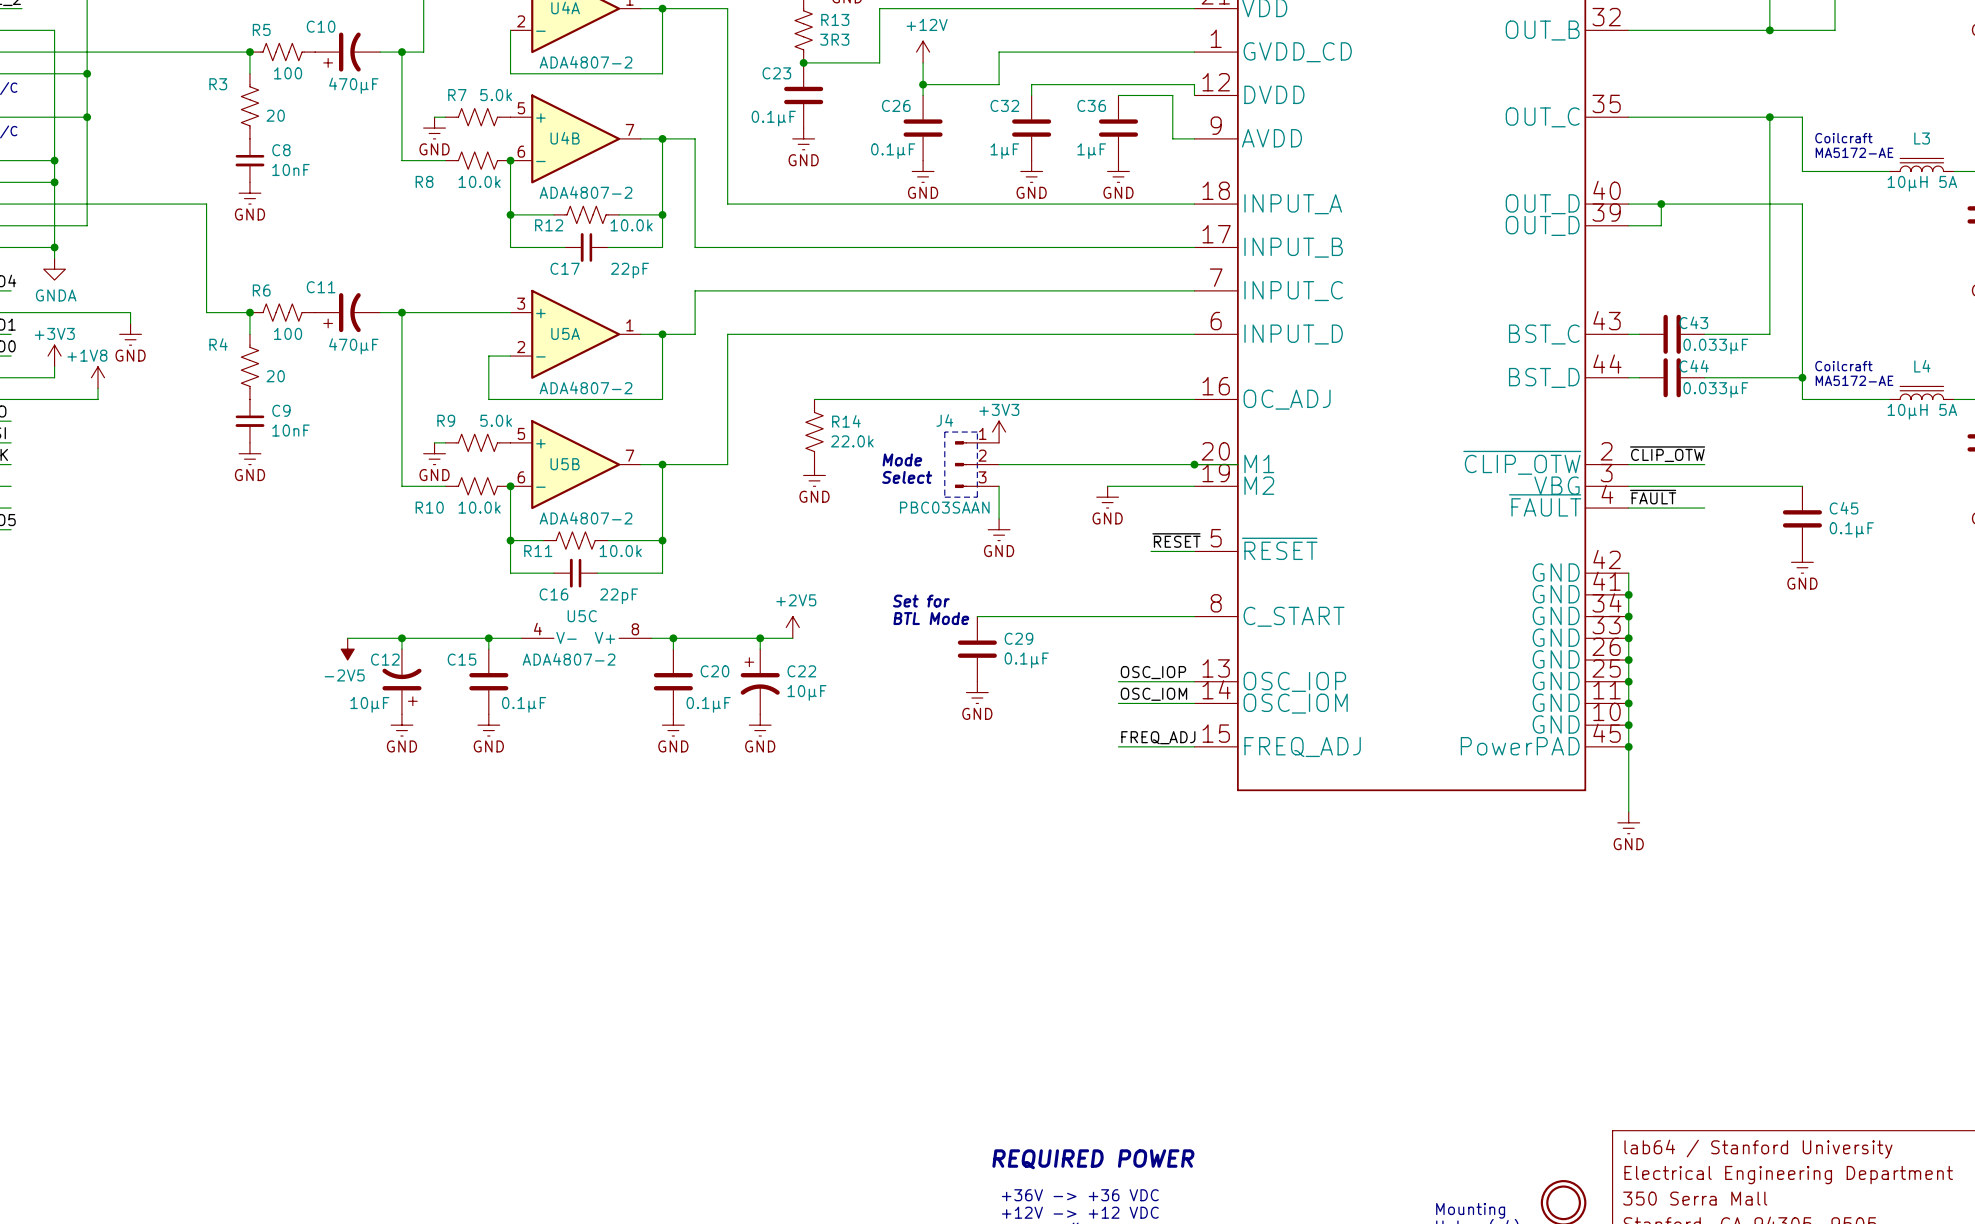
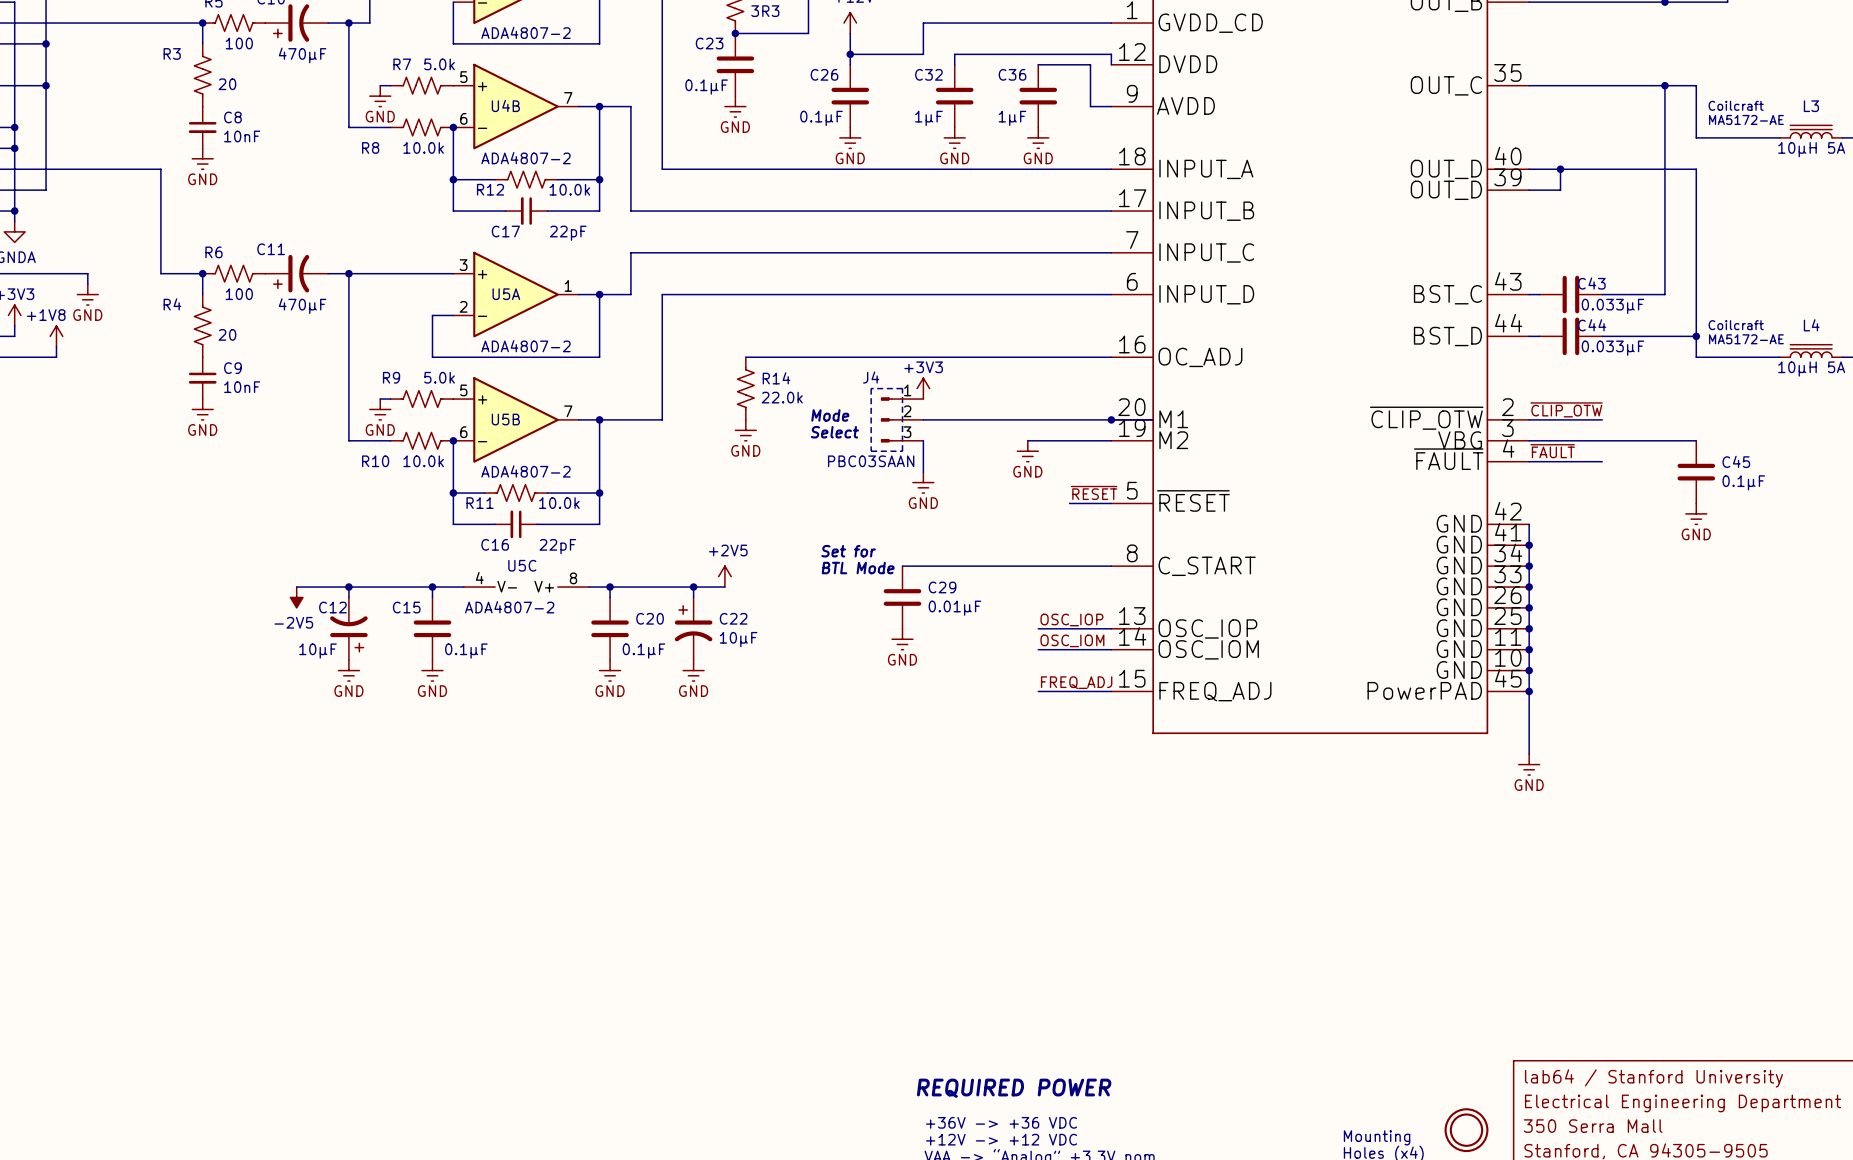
C29 value: 0.1µF (1026, 660) -> 0.01µF (954, 608)

